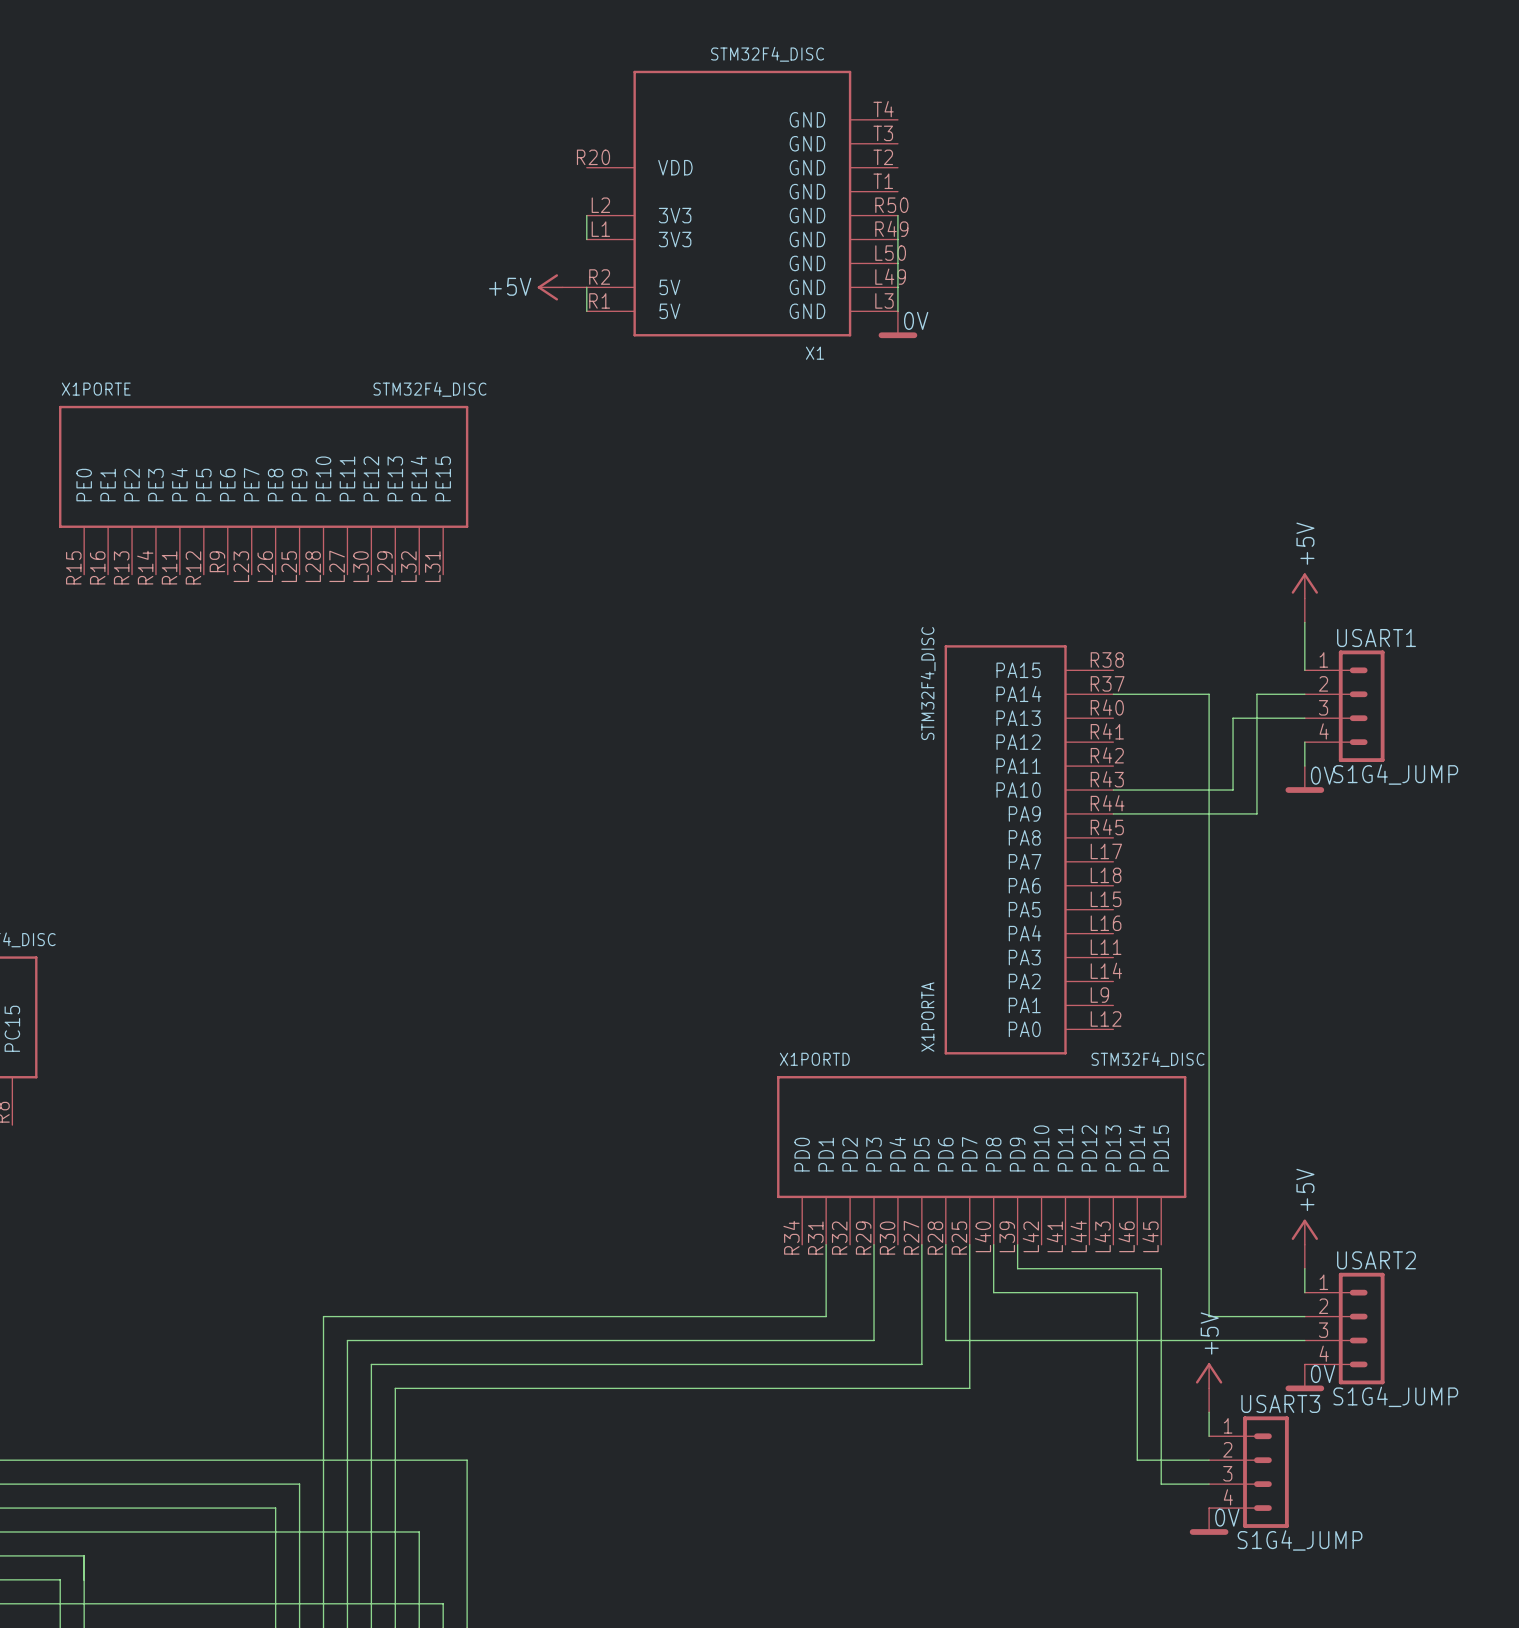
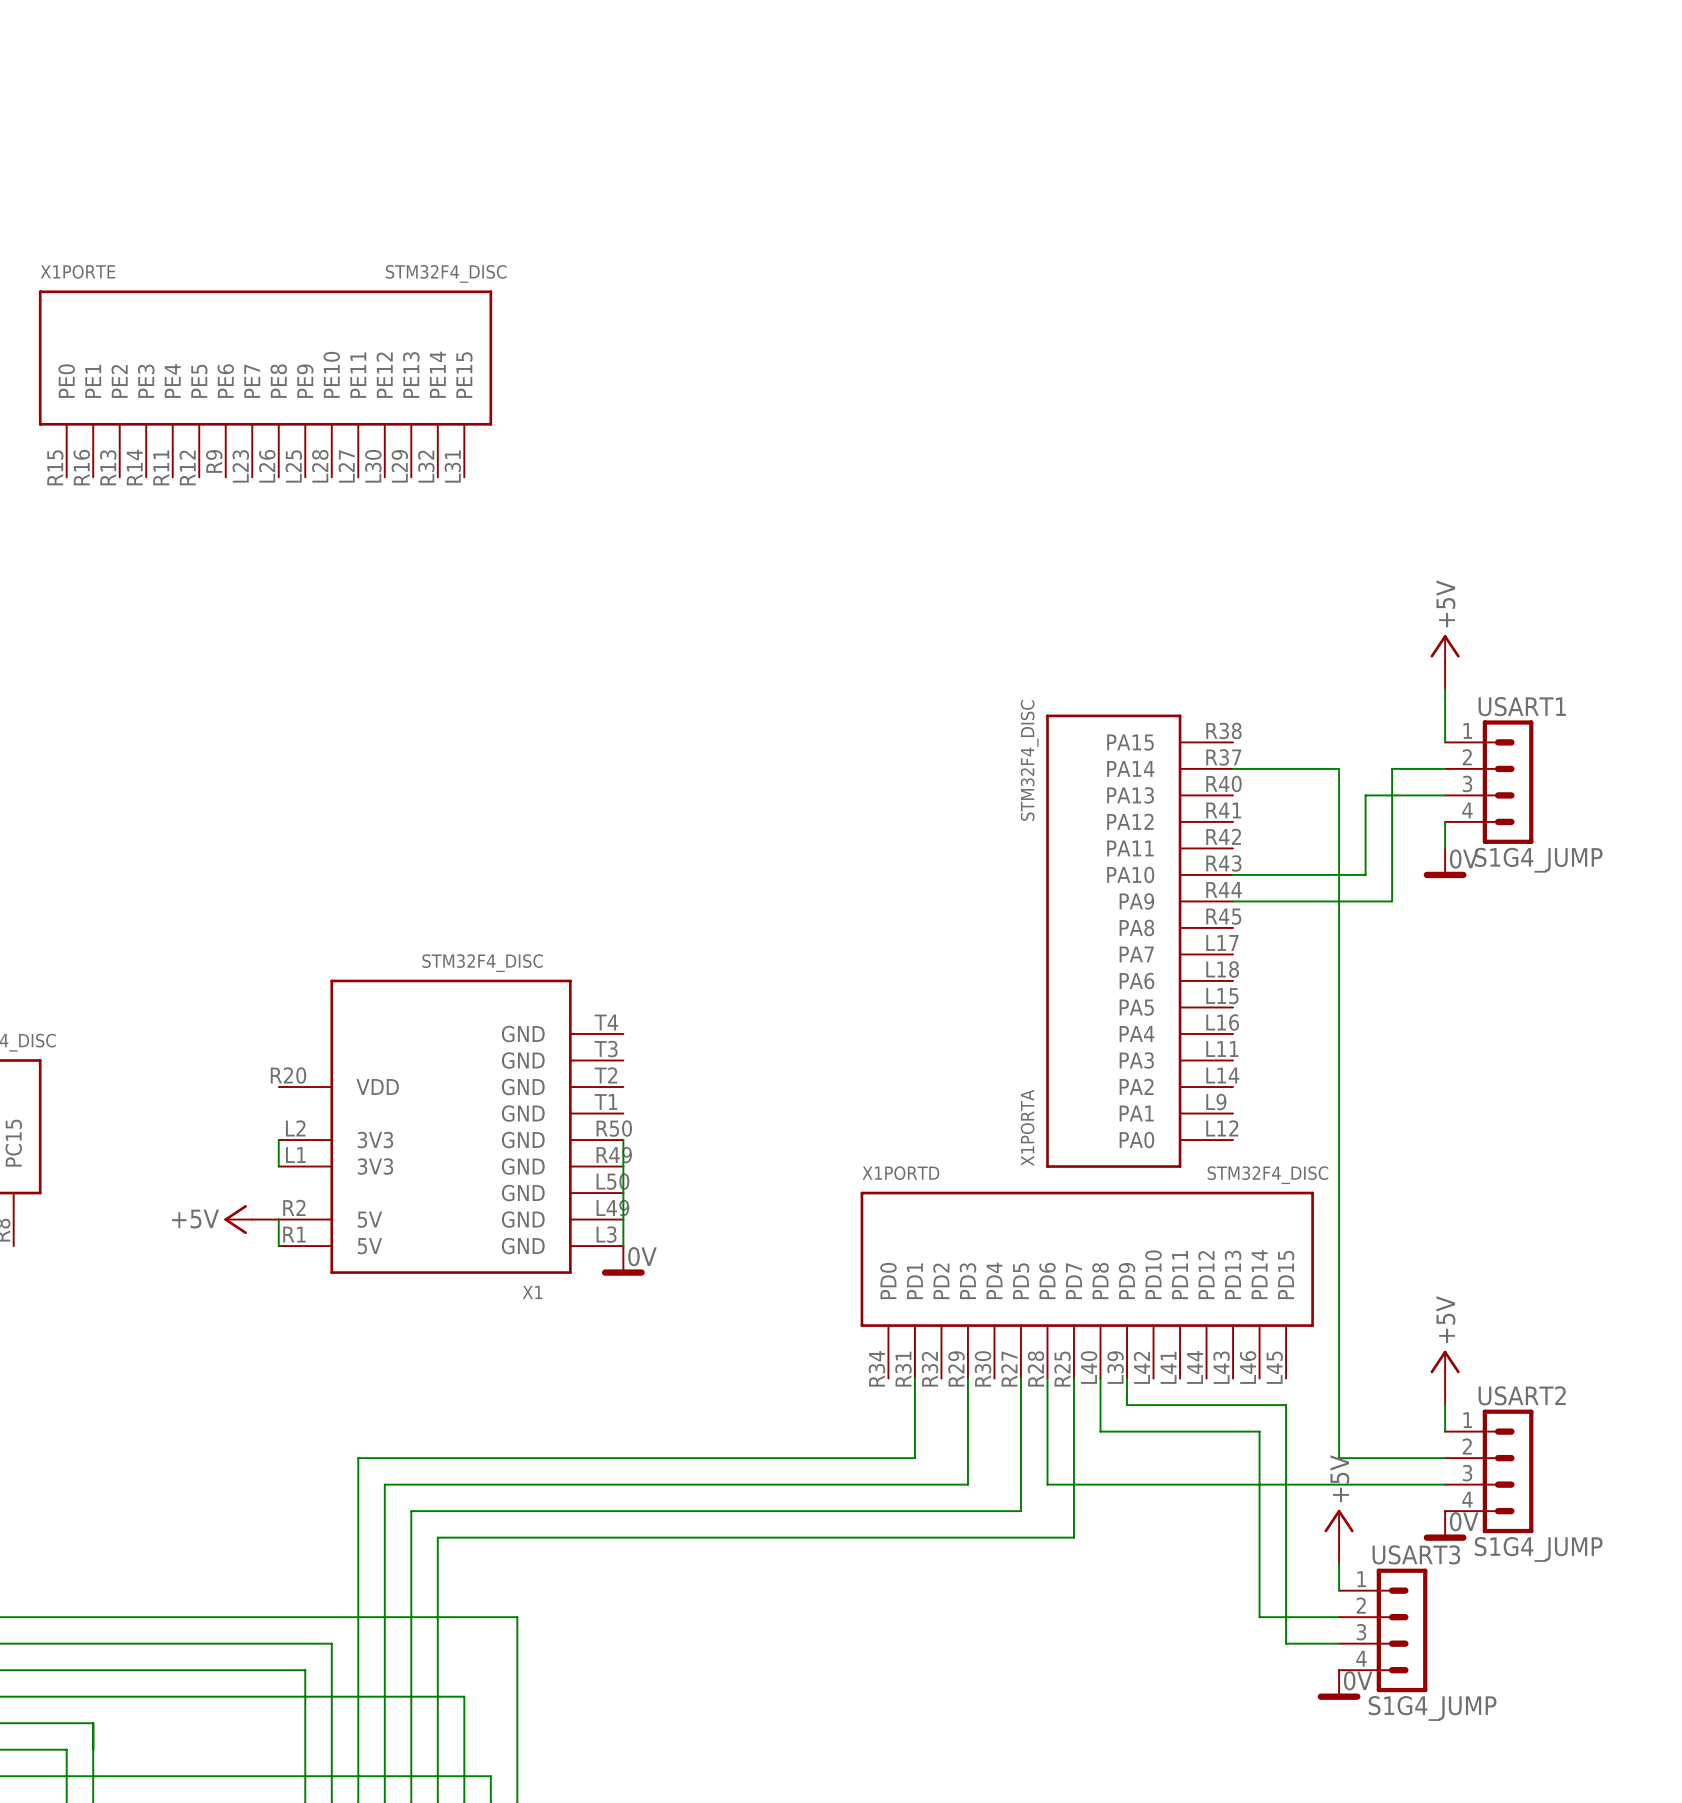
X1 position: (742, 203) -> (451, 1126)
wire: (586, 215) (586, 239) -> none
wire: (897, 215) (897, 311) -> none
power symbol: +5V (562, 287) -> none
wire: (586, 287) (586, 311) -> none
power symbol: 0V (897, 324) -> none
X1PORTE position: (263, 490) -> (265, 383)
wire: none -> (278, 1140) (278, 1166)
wire: none -> (623, 1140) (623, 1246)
power symbol: none -> +5V (251, 1219)
wire: none -> (278, 1219) (278, 1246)
power symbol: none -> 0V (623, 1260)

